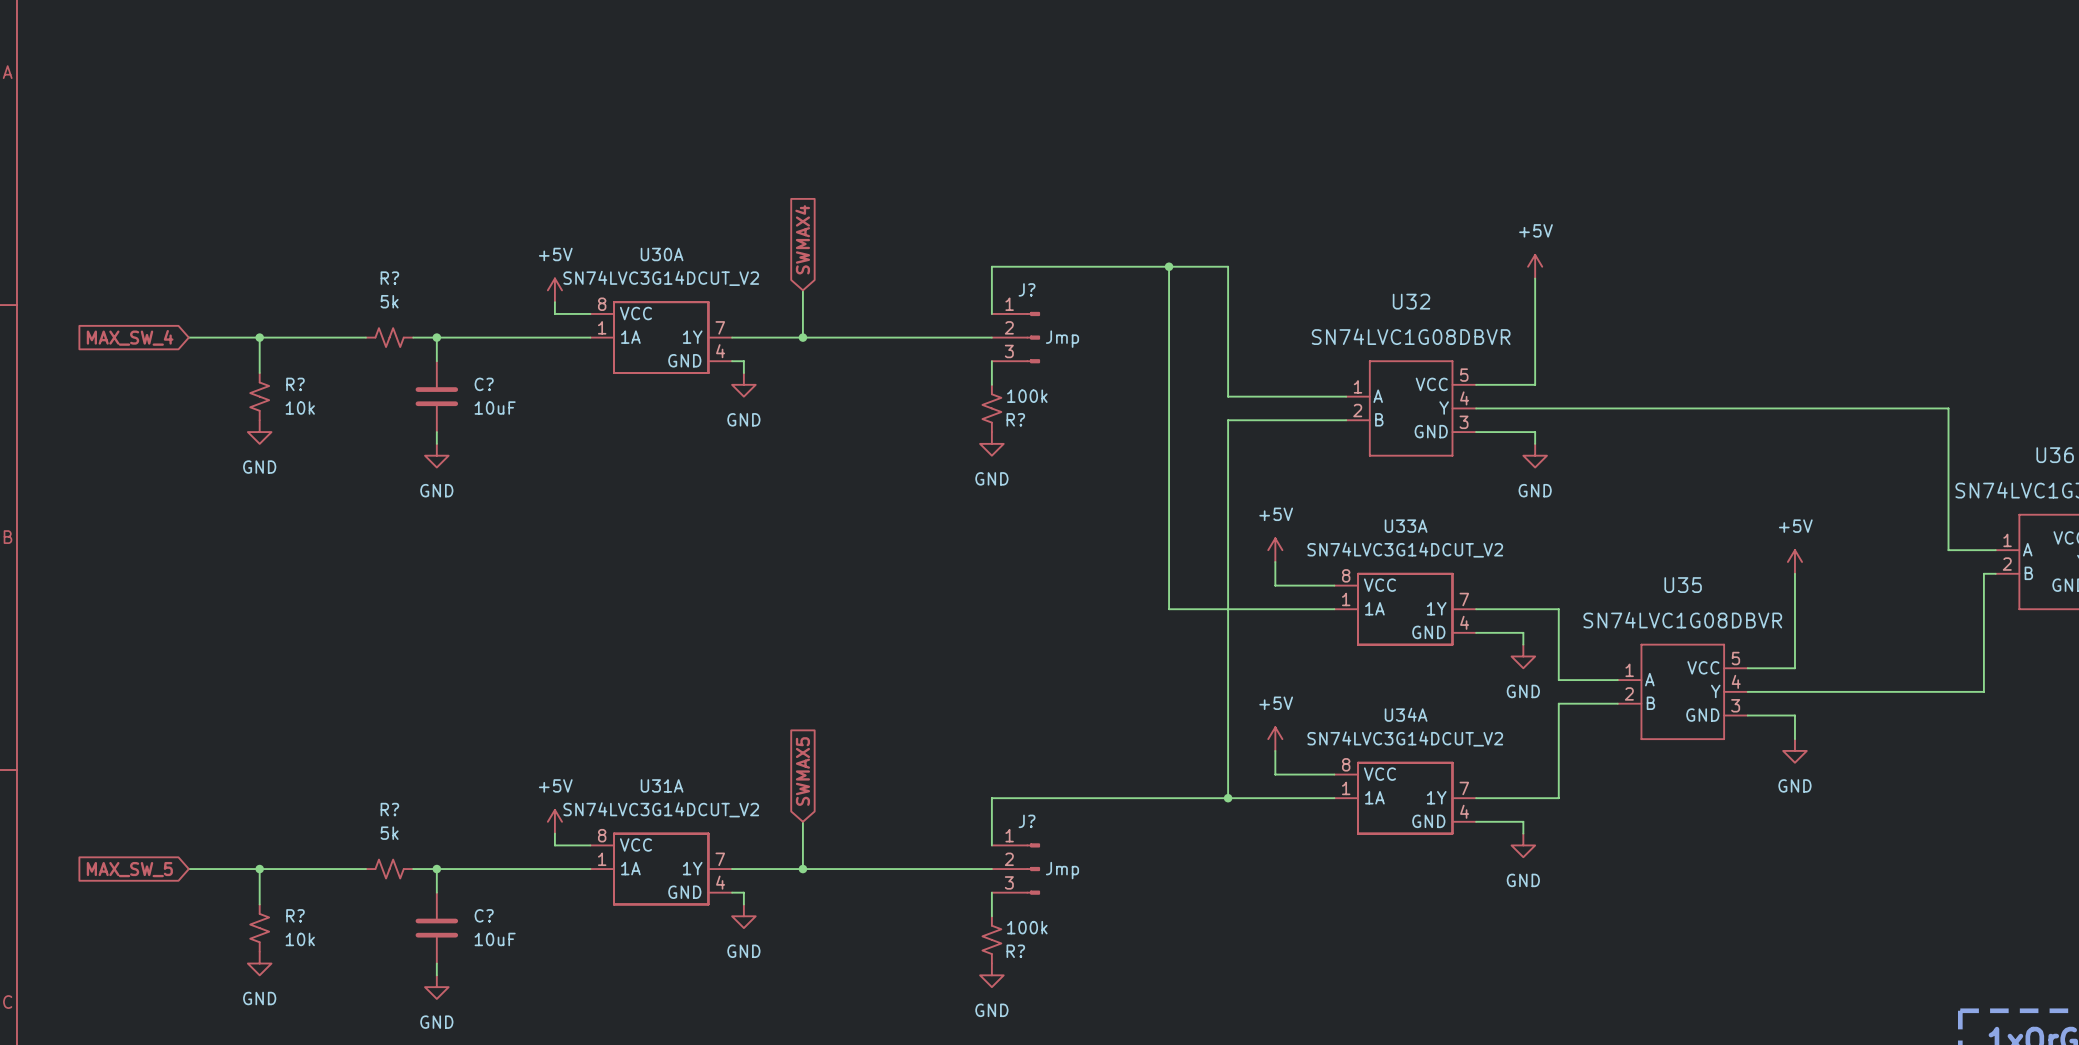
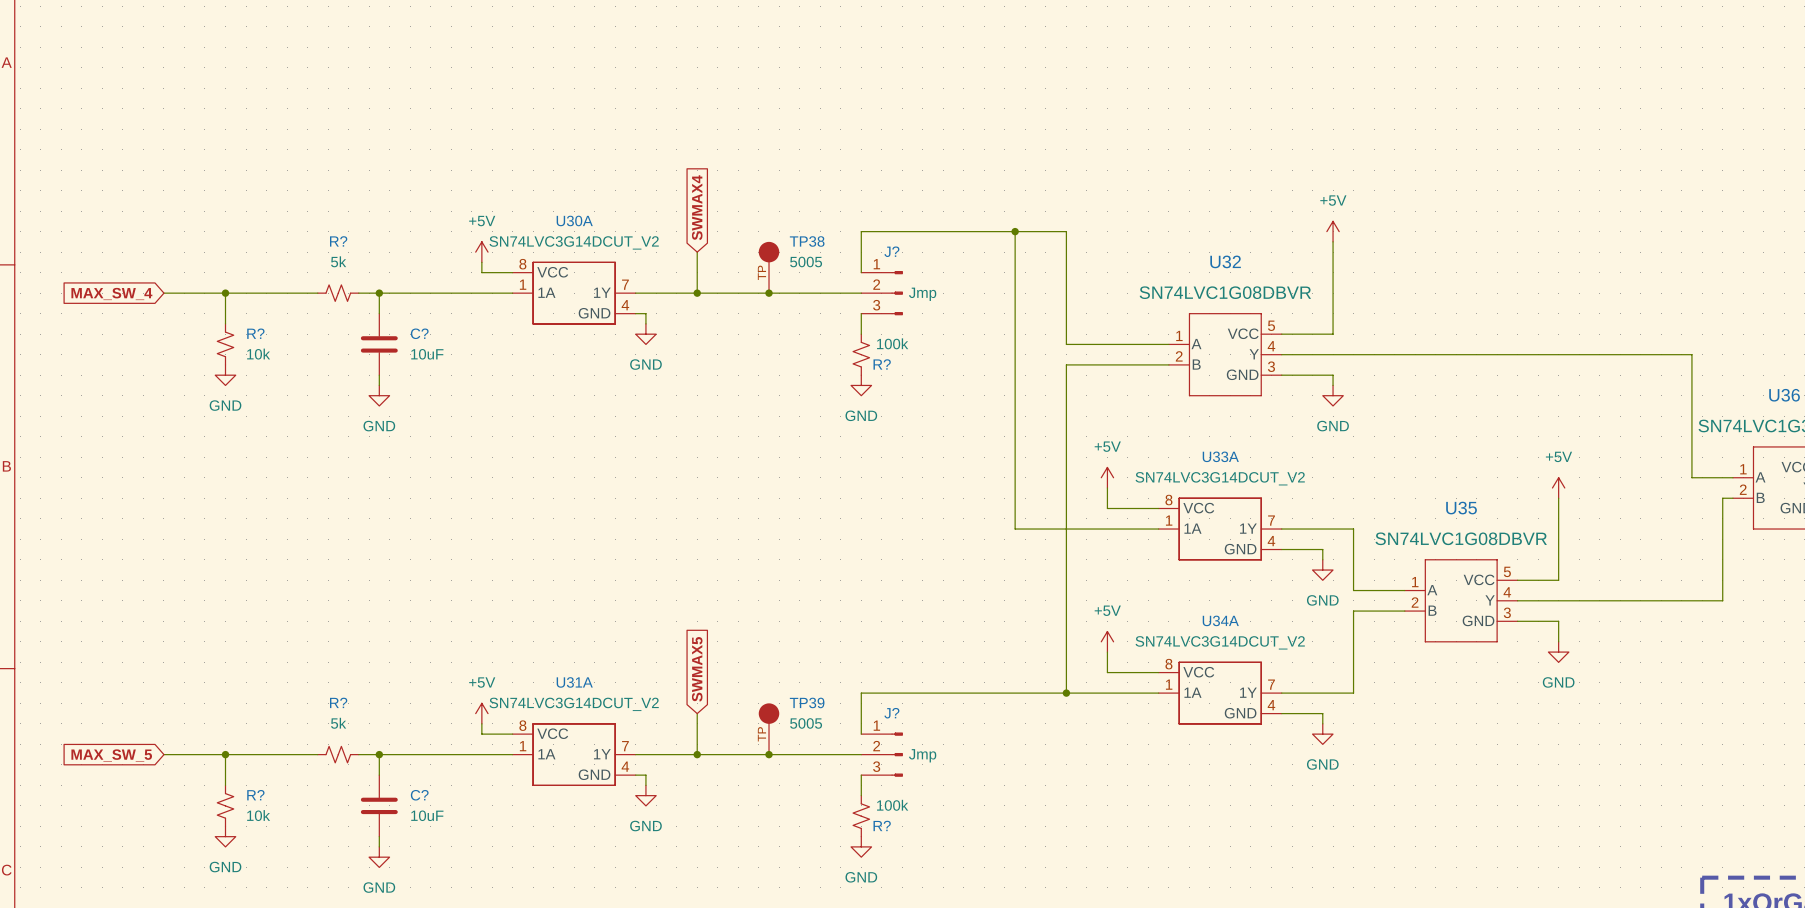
TP38: none -> 5005 (769, 267)
junction: none -> (769, 293)
TP39: none -> 5005 (769, 728)
junction: none -> (769, 754)

